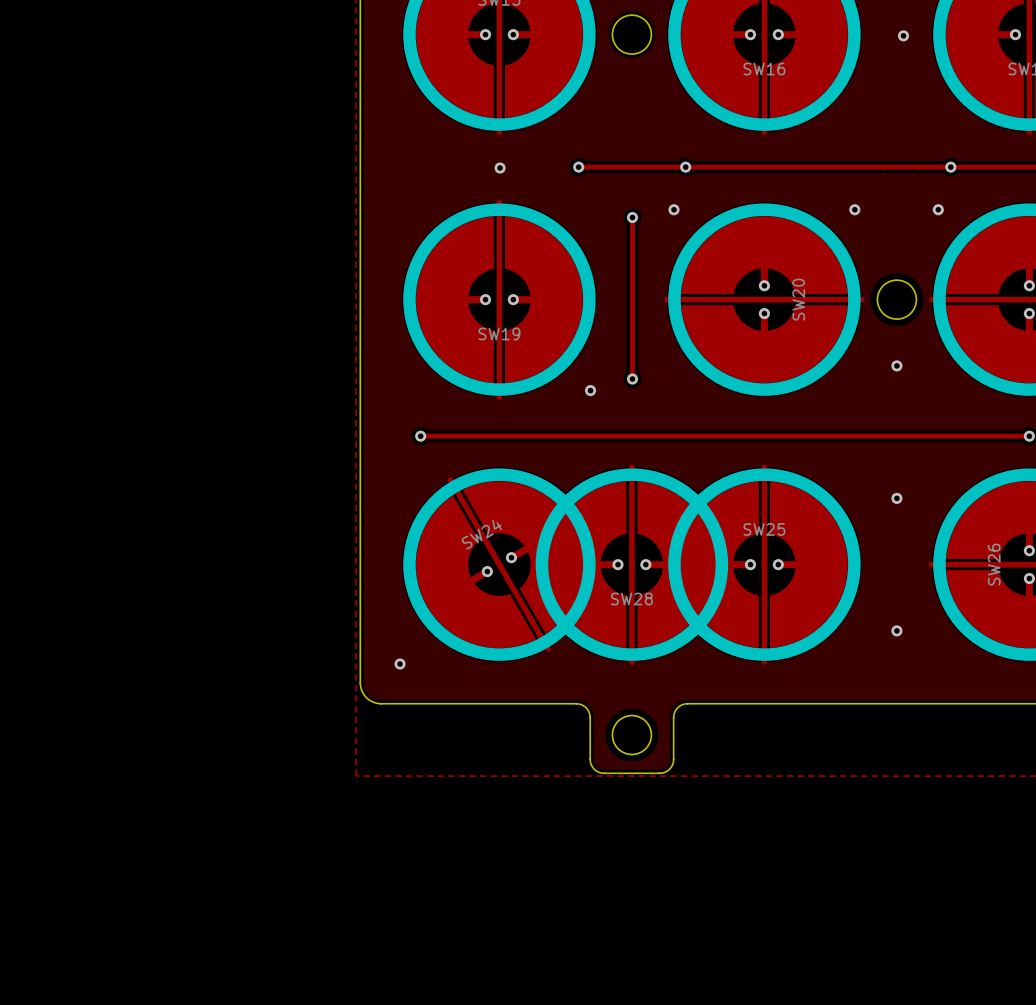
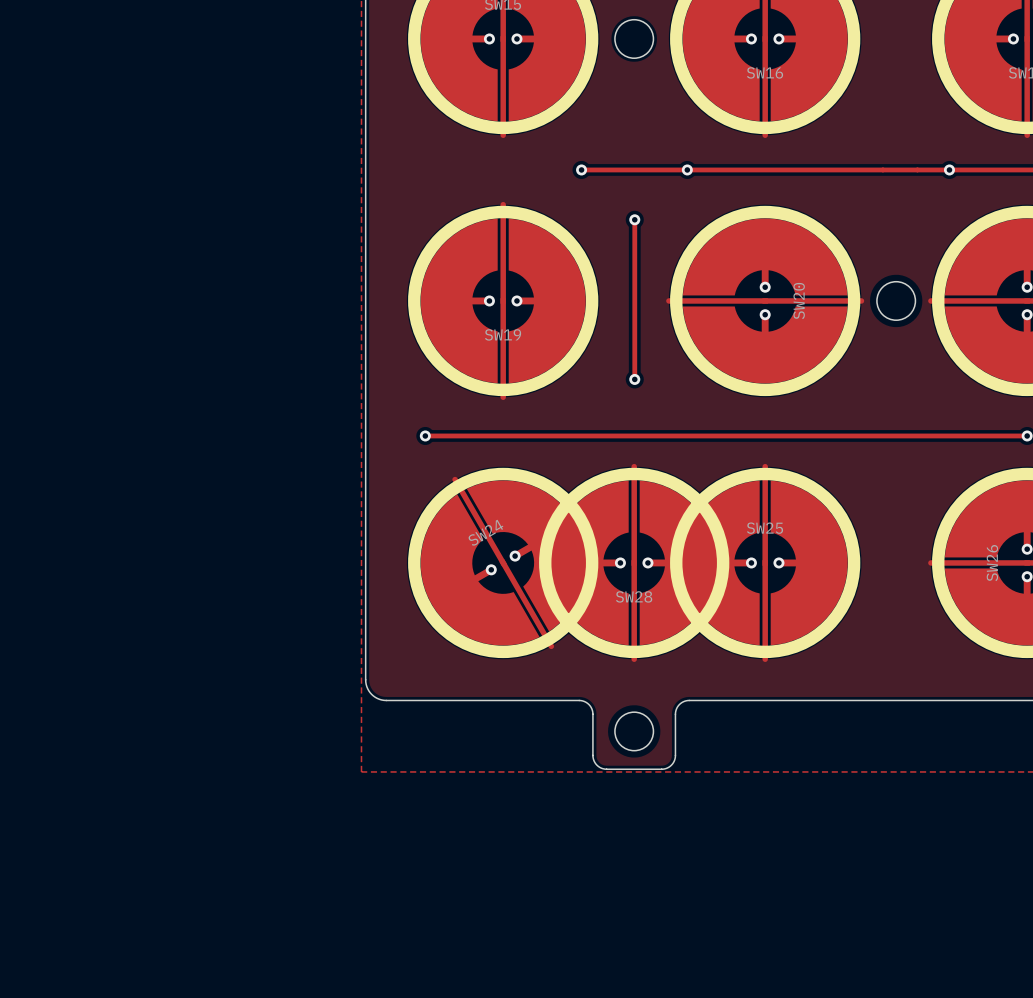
via: (903, 35) -> none
via: (500, 168) -> none
via: (673, 209) -> none
via: (854, 209) -> none
via: (938, 209) -> none
via: (896, 365) -> none
via: (590, 390) -> none
via: (896, 498) -> none
via: (896, 630) -> none
via: (400, 664) -> none

